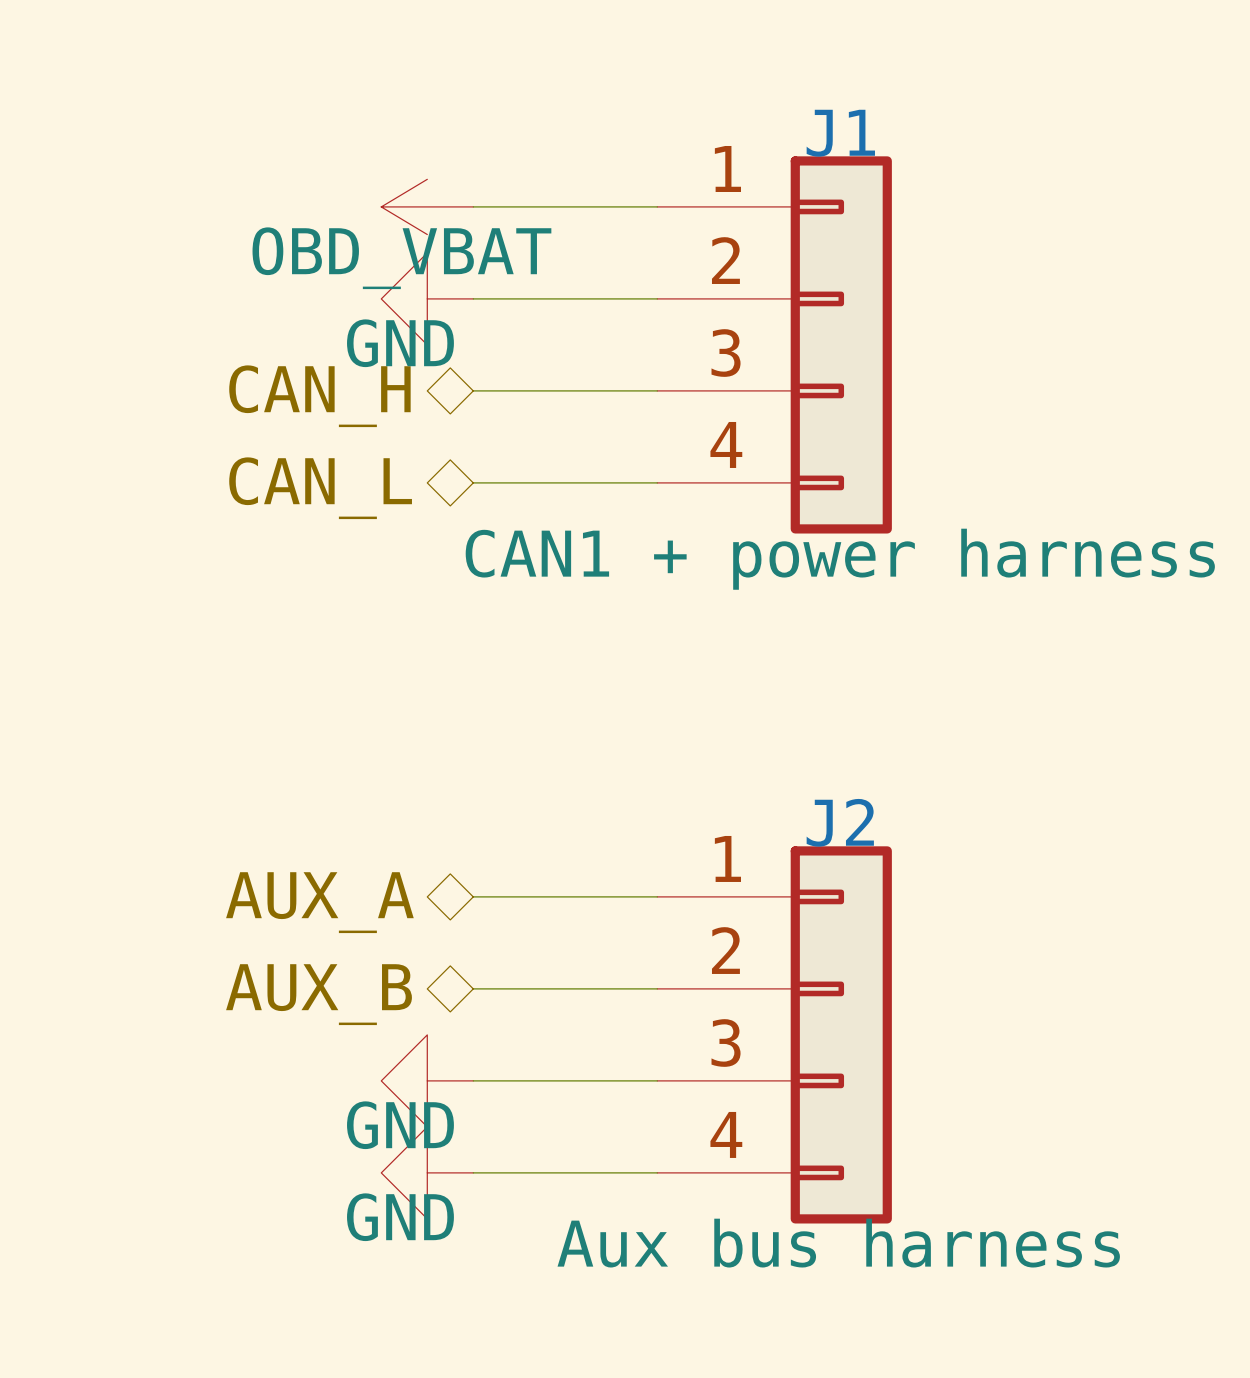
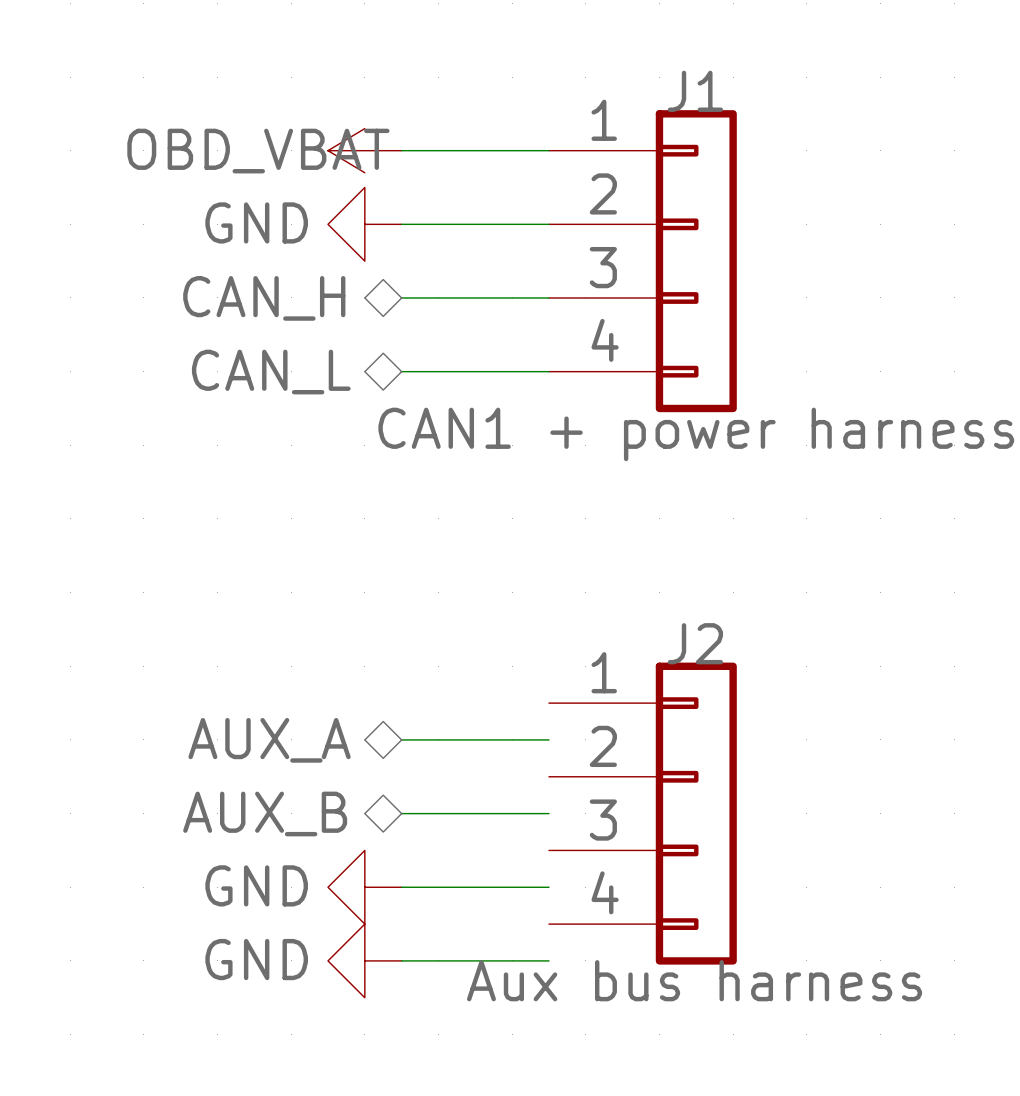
power symbol text position: OBD_VBAT (401, 258) -> OBD_VBAT (258, 151)
power symbol text position: GND (400, 343) -> GND (256, 222)
wire: (473, 896) (657, 896) -> (401, 739) (548, 739)
hierarchical label position: AUX_A (319, 902) -> AUX_A (269, 740)
wire: (473, 988) (657, 988) -> (401, 813) (548, 813)
hierarchical label position: AUX_B (319, 994) -> AUX_B (265, 813)
power symbol: GND (427, 1080) -> none
wire: (473, 1080) (657, 1080) -> (401, 887) (548, 887)
power symbol: none -> GND (364, 887)
power symbol: GND (427, 1172) -> none
wire: (473, 1172) (657, 1172) -> (401, 960) (548, 960)
power symbol: none -> GND (364, 960)

